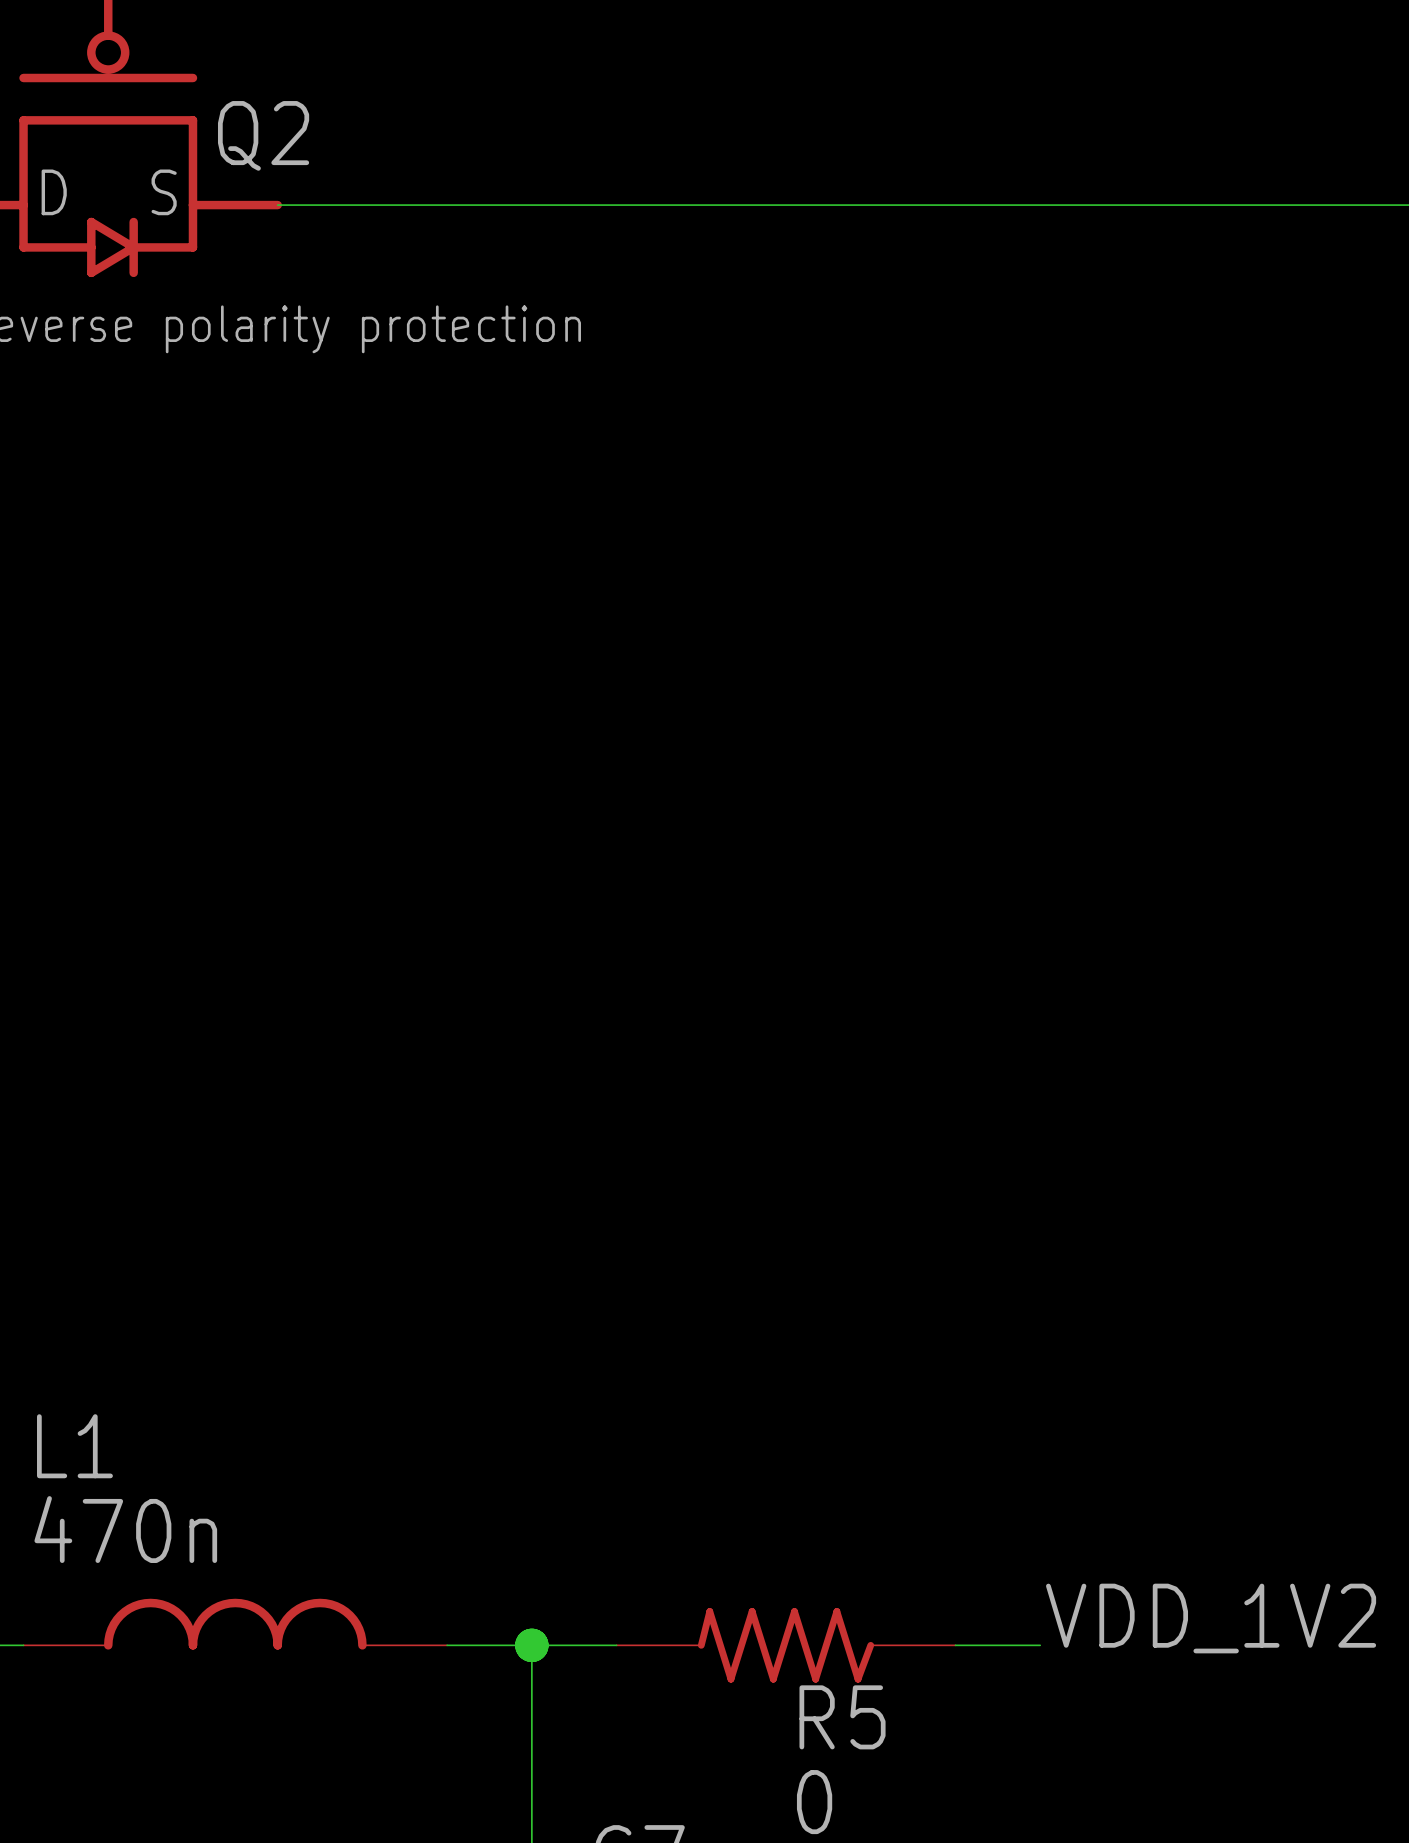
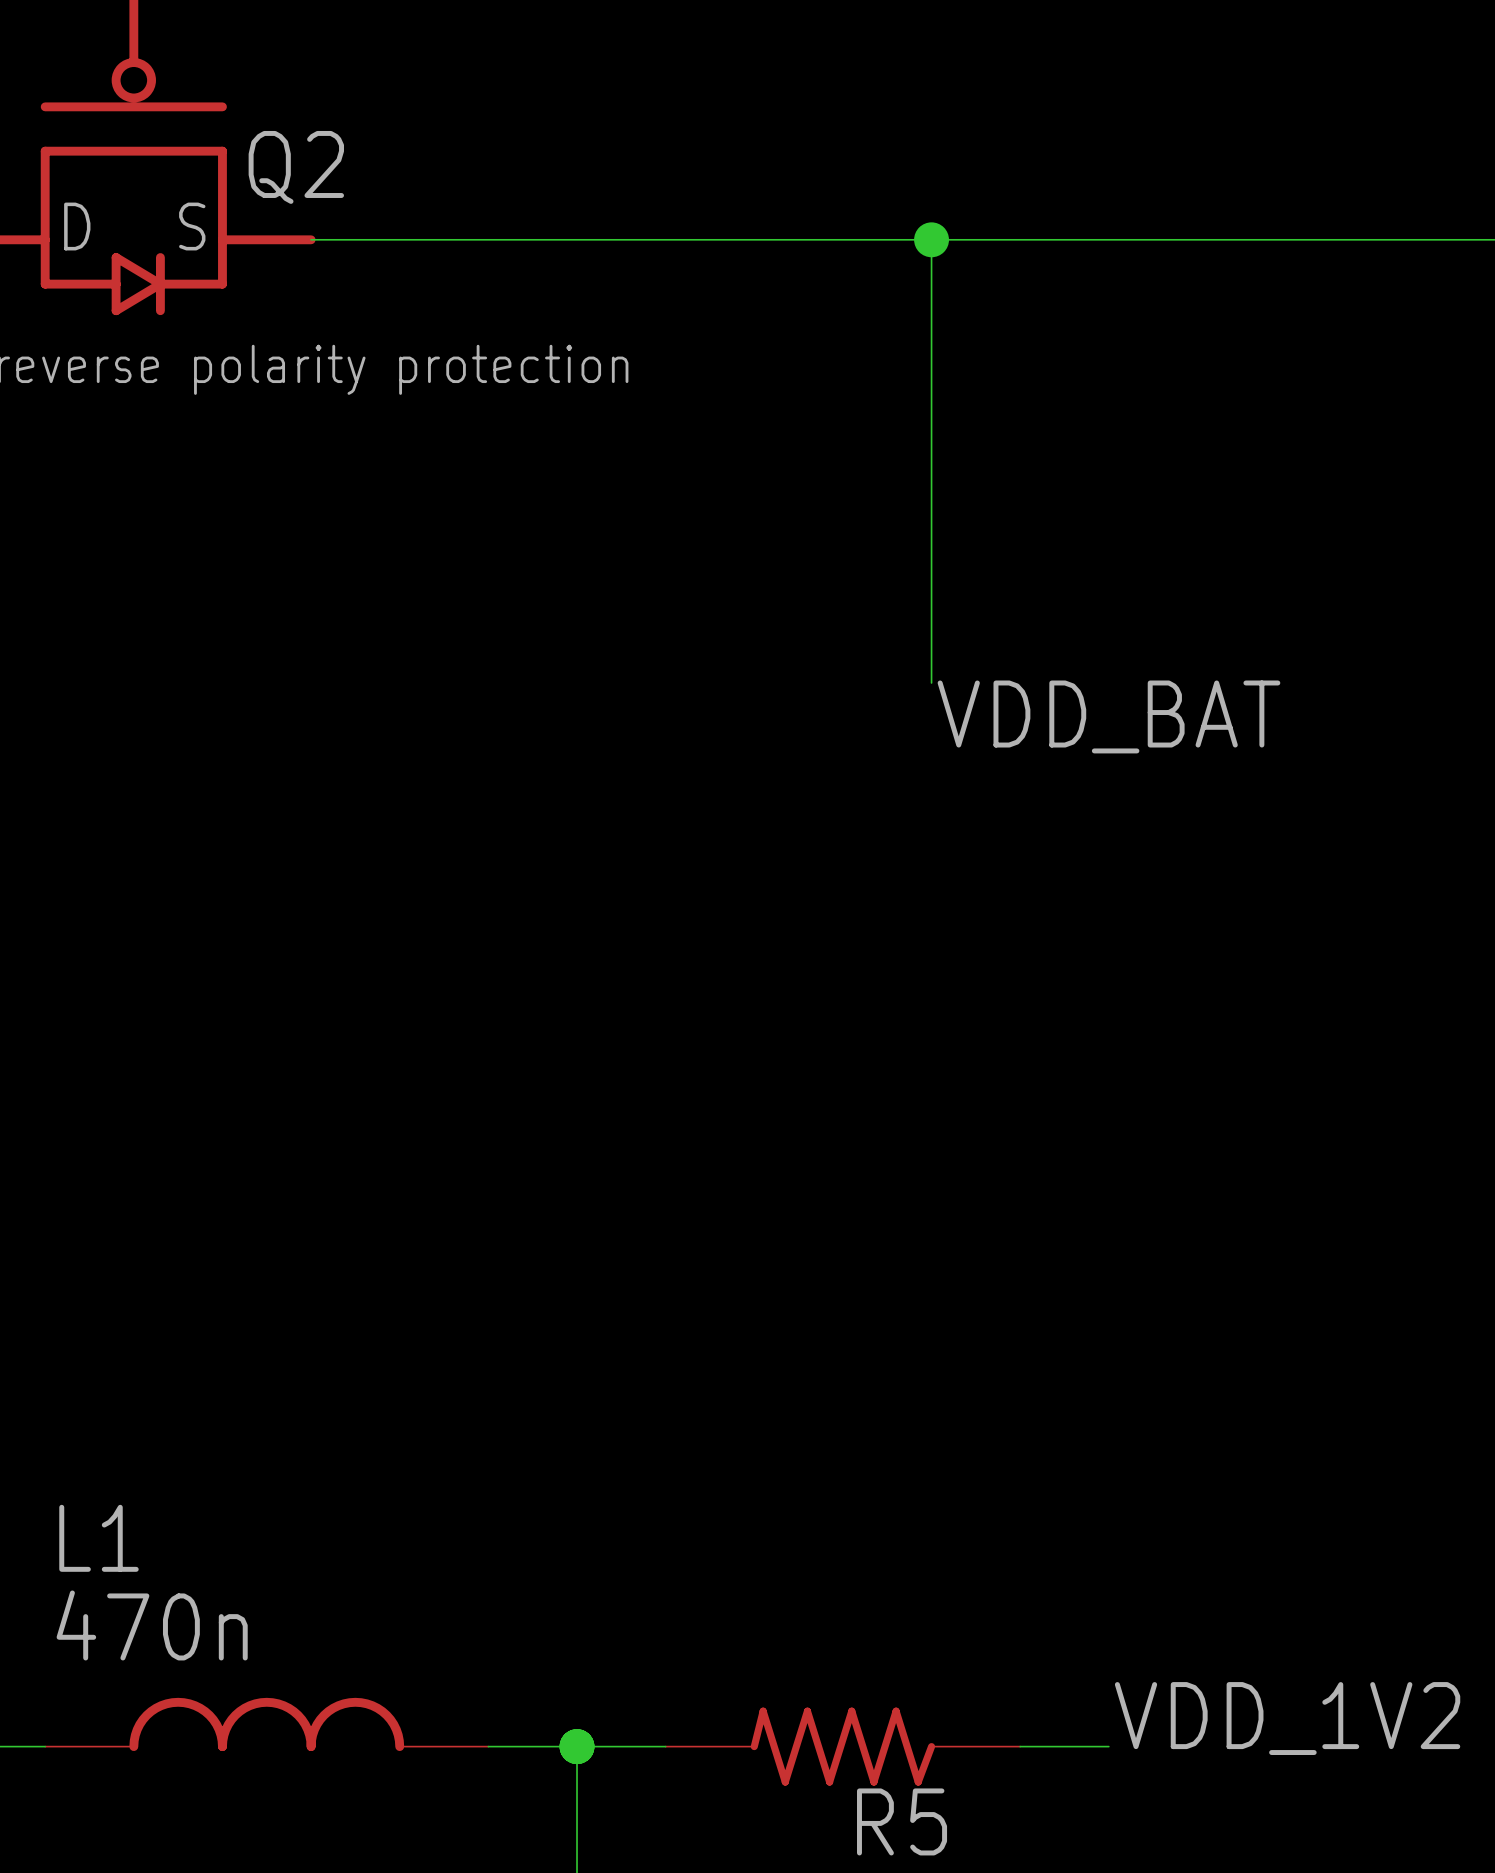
wire: none -> (931, 239) (931, 682)
junction: none -> (931, 239)
label: none -> VDD_BAT (1108, 716)

